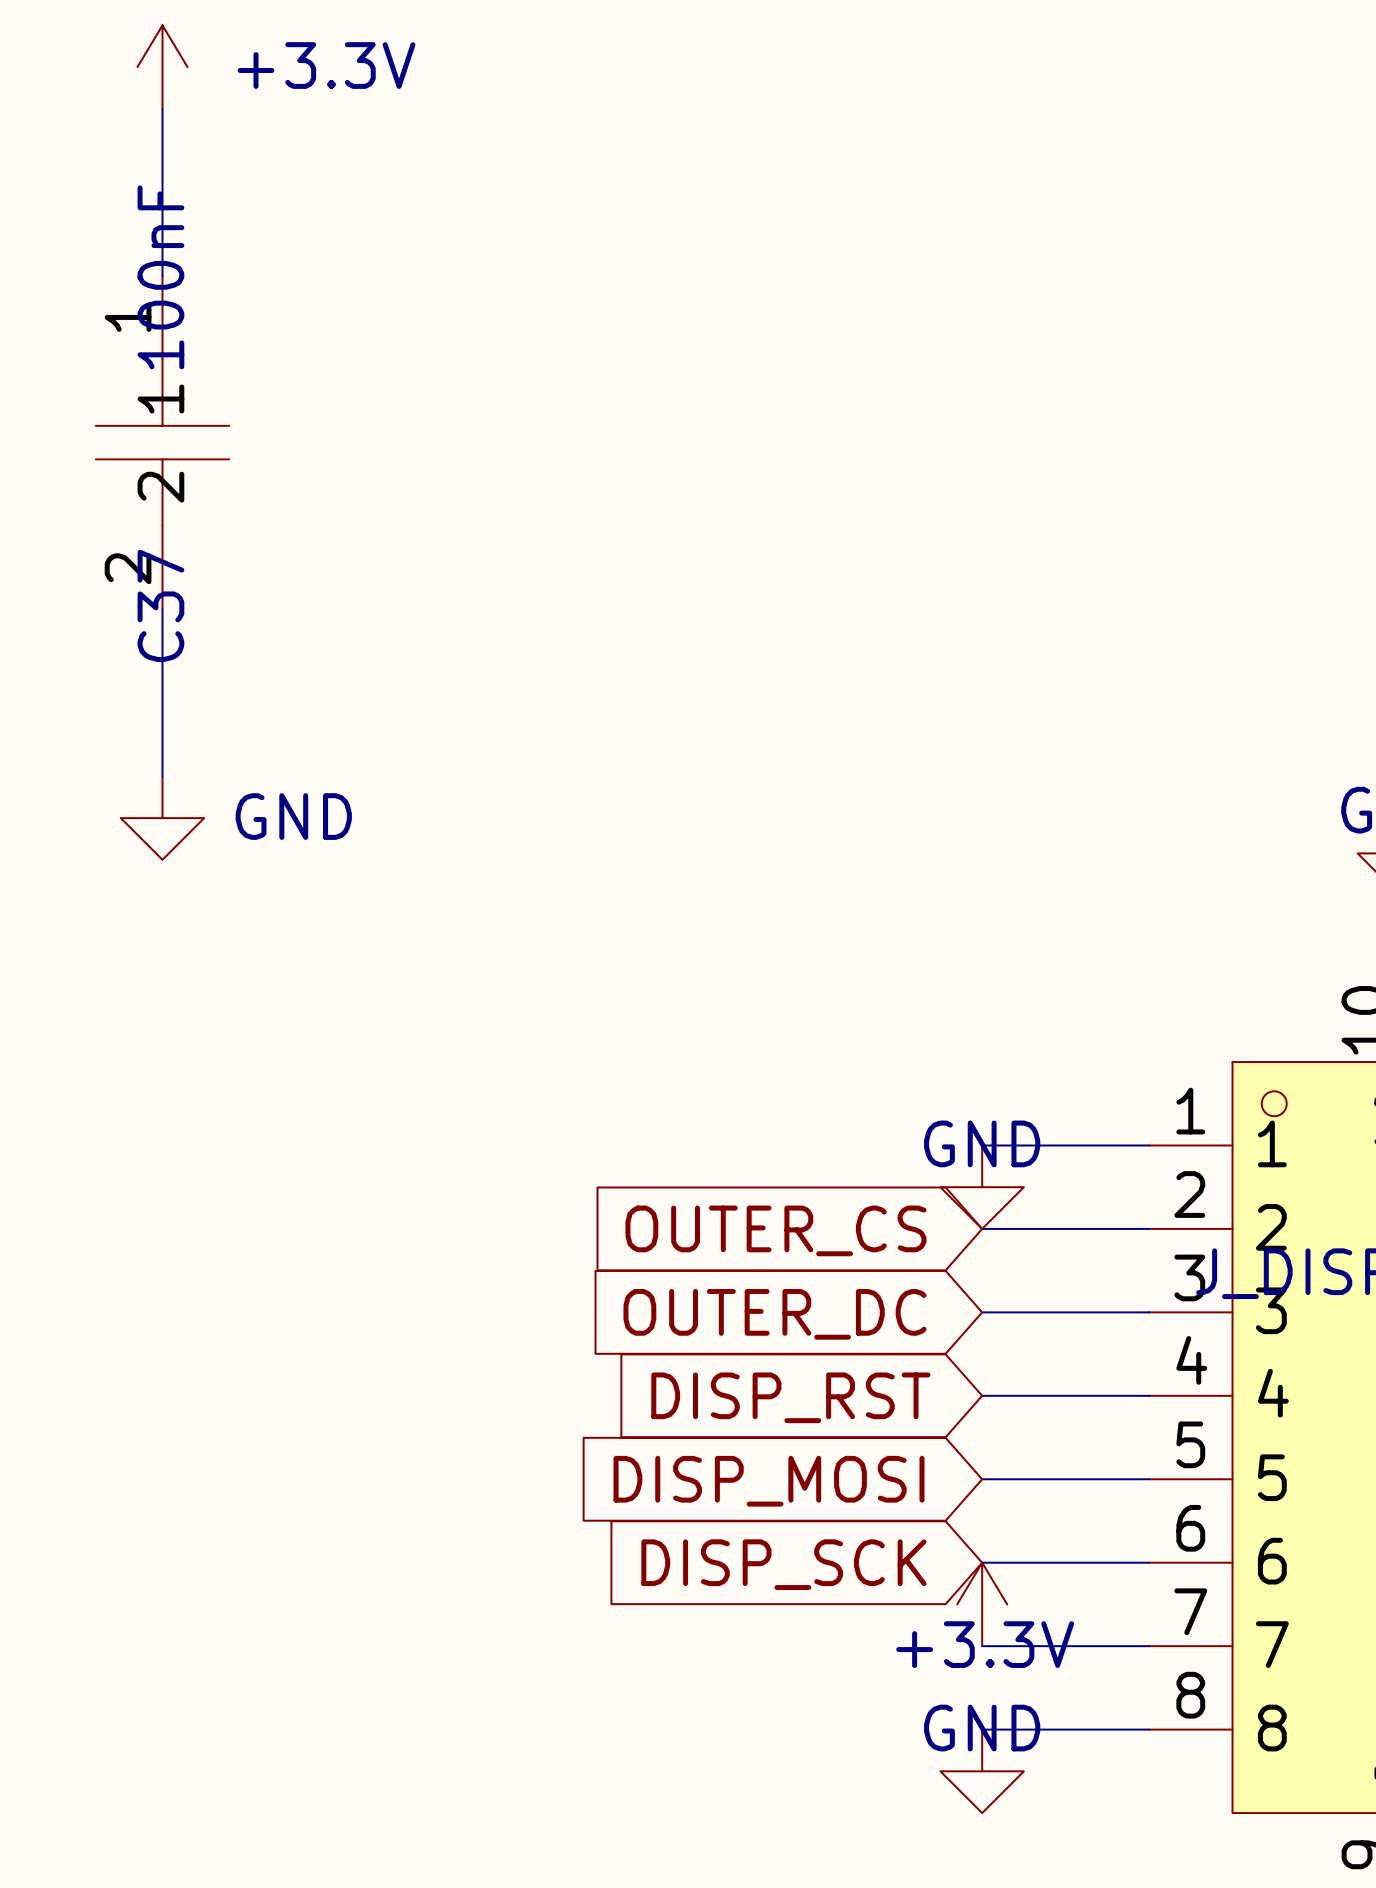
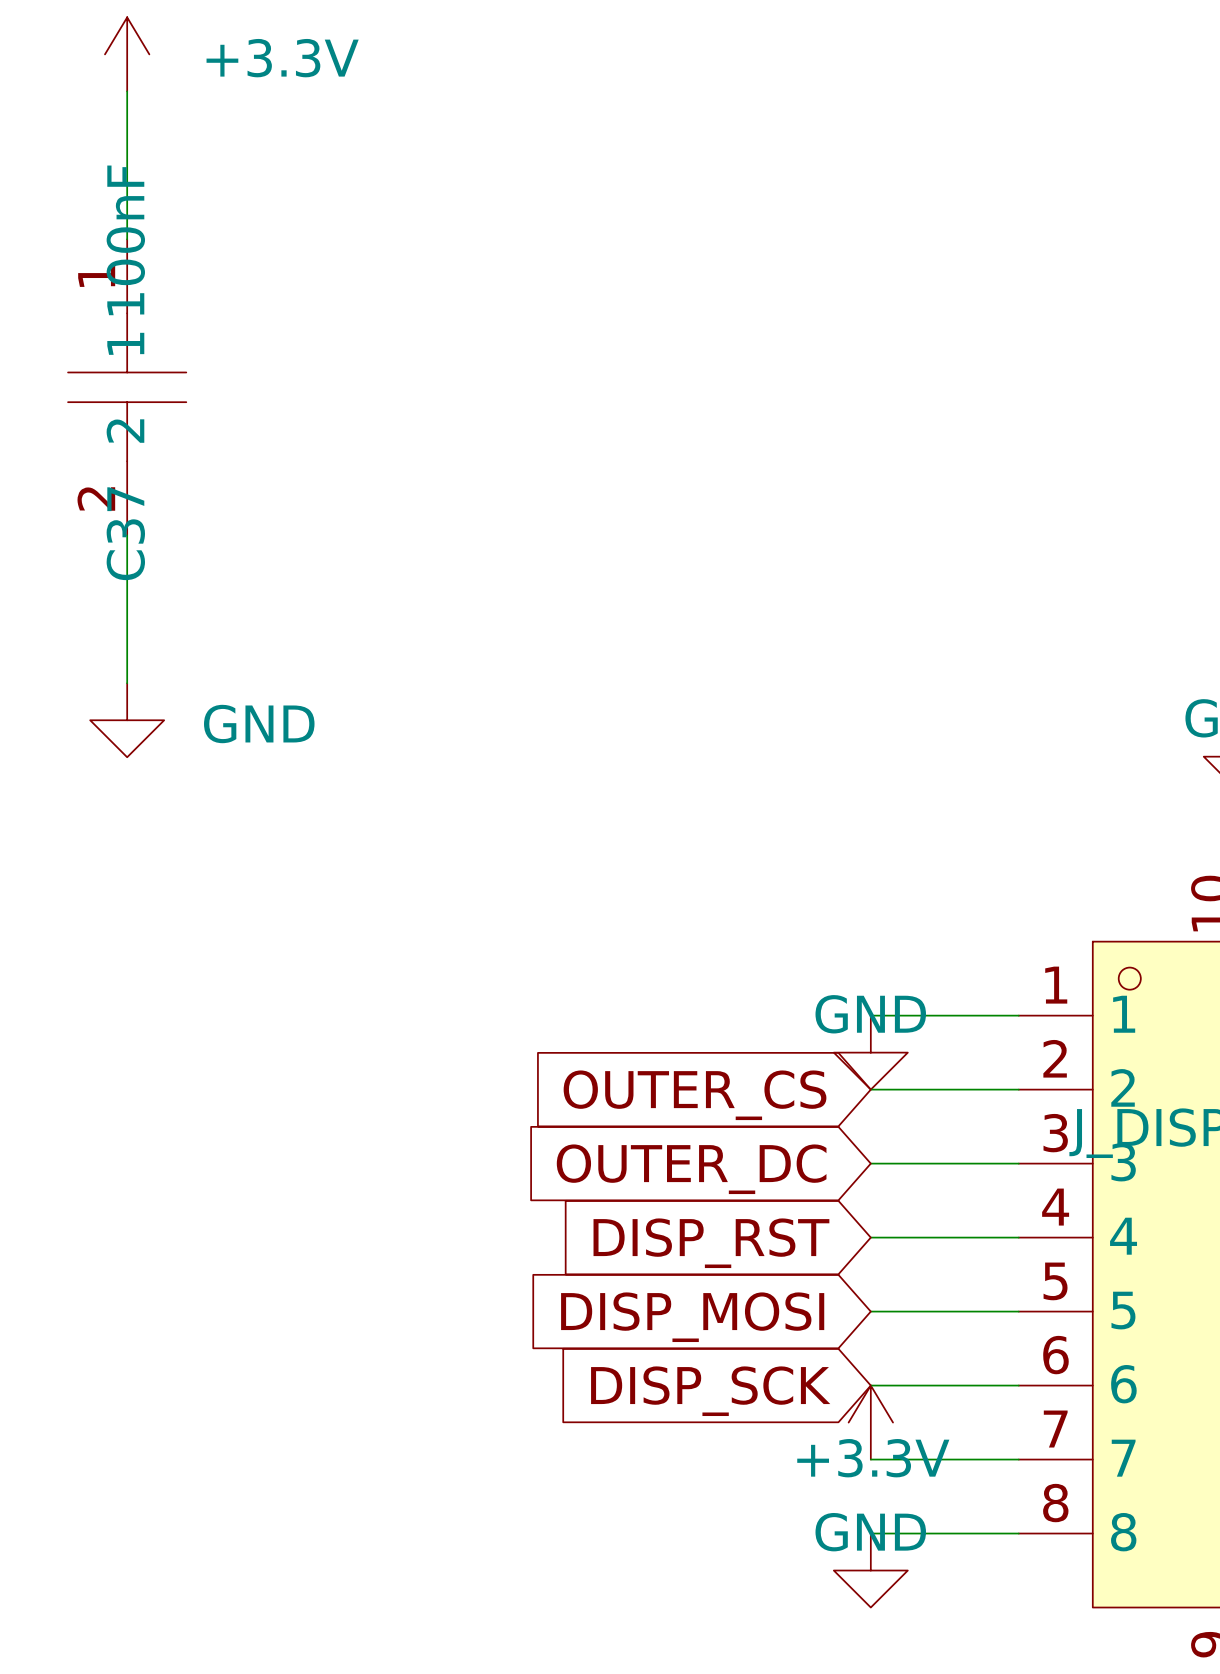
power symbol position: +3.3V (162, 67) -> +3.3V (127, 54)
wire: (162, 108) (162, 275) -> (127, 91) (127, 239)
C37 position: (162, 442) -> (127, 387)
wire: (162, 609) (162, 776) -> (127, 535) (127, 683)
power symbol position: GND (162, 818) -> GND (127, 720)

